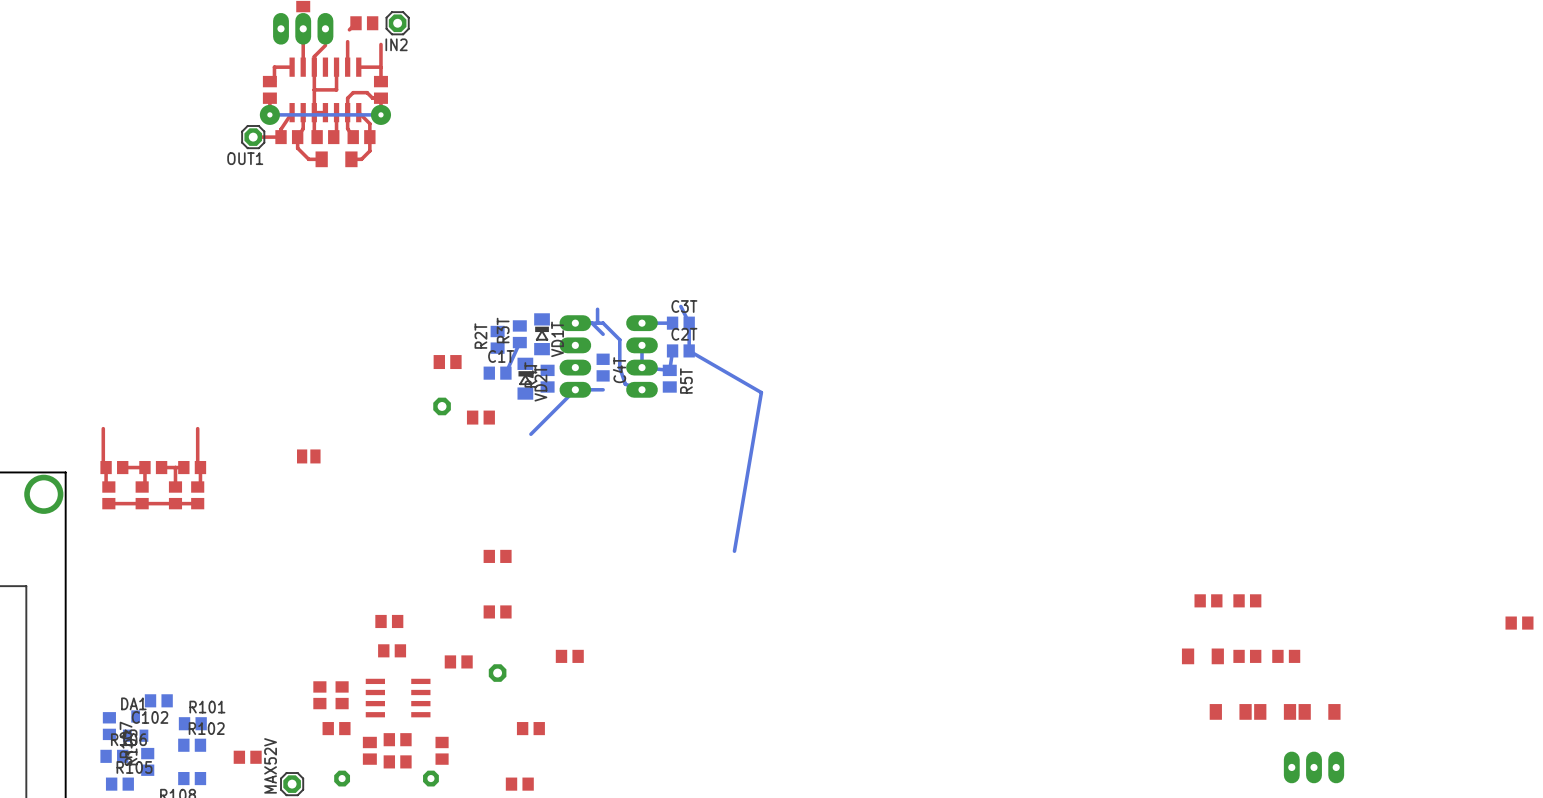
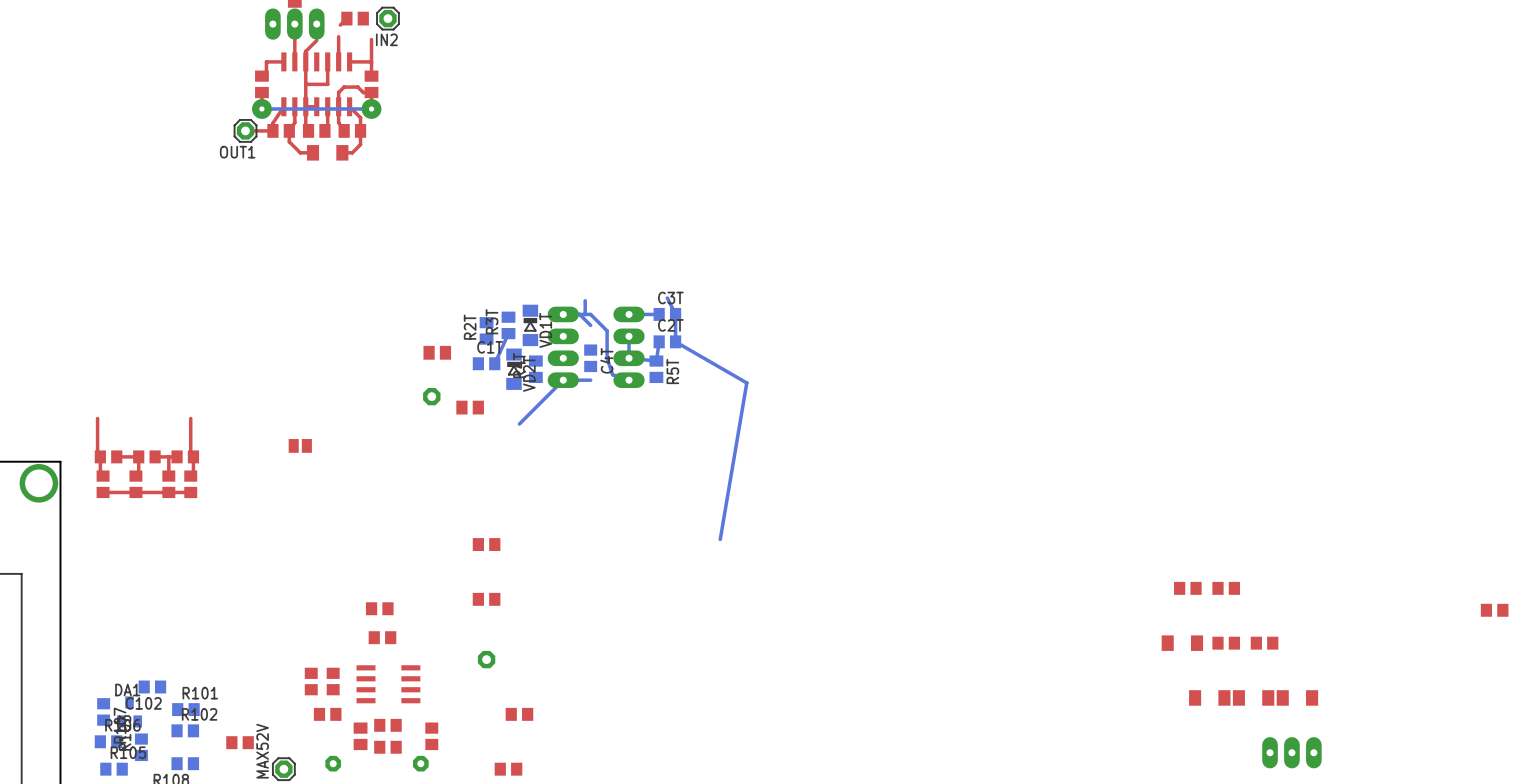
part: (569, 656) -> none
part: (458, 661) -> none

